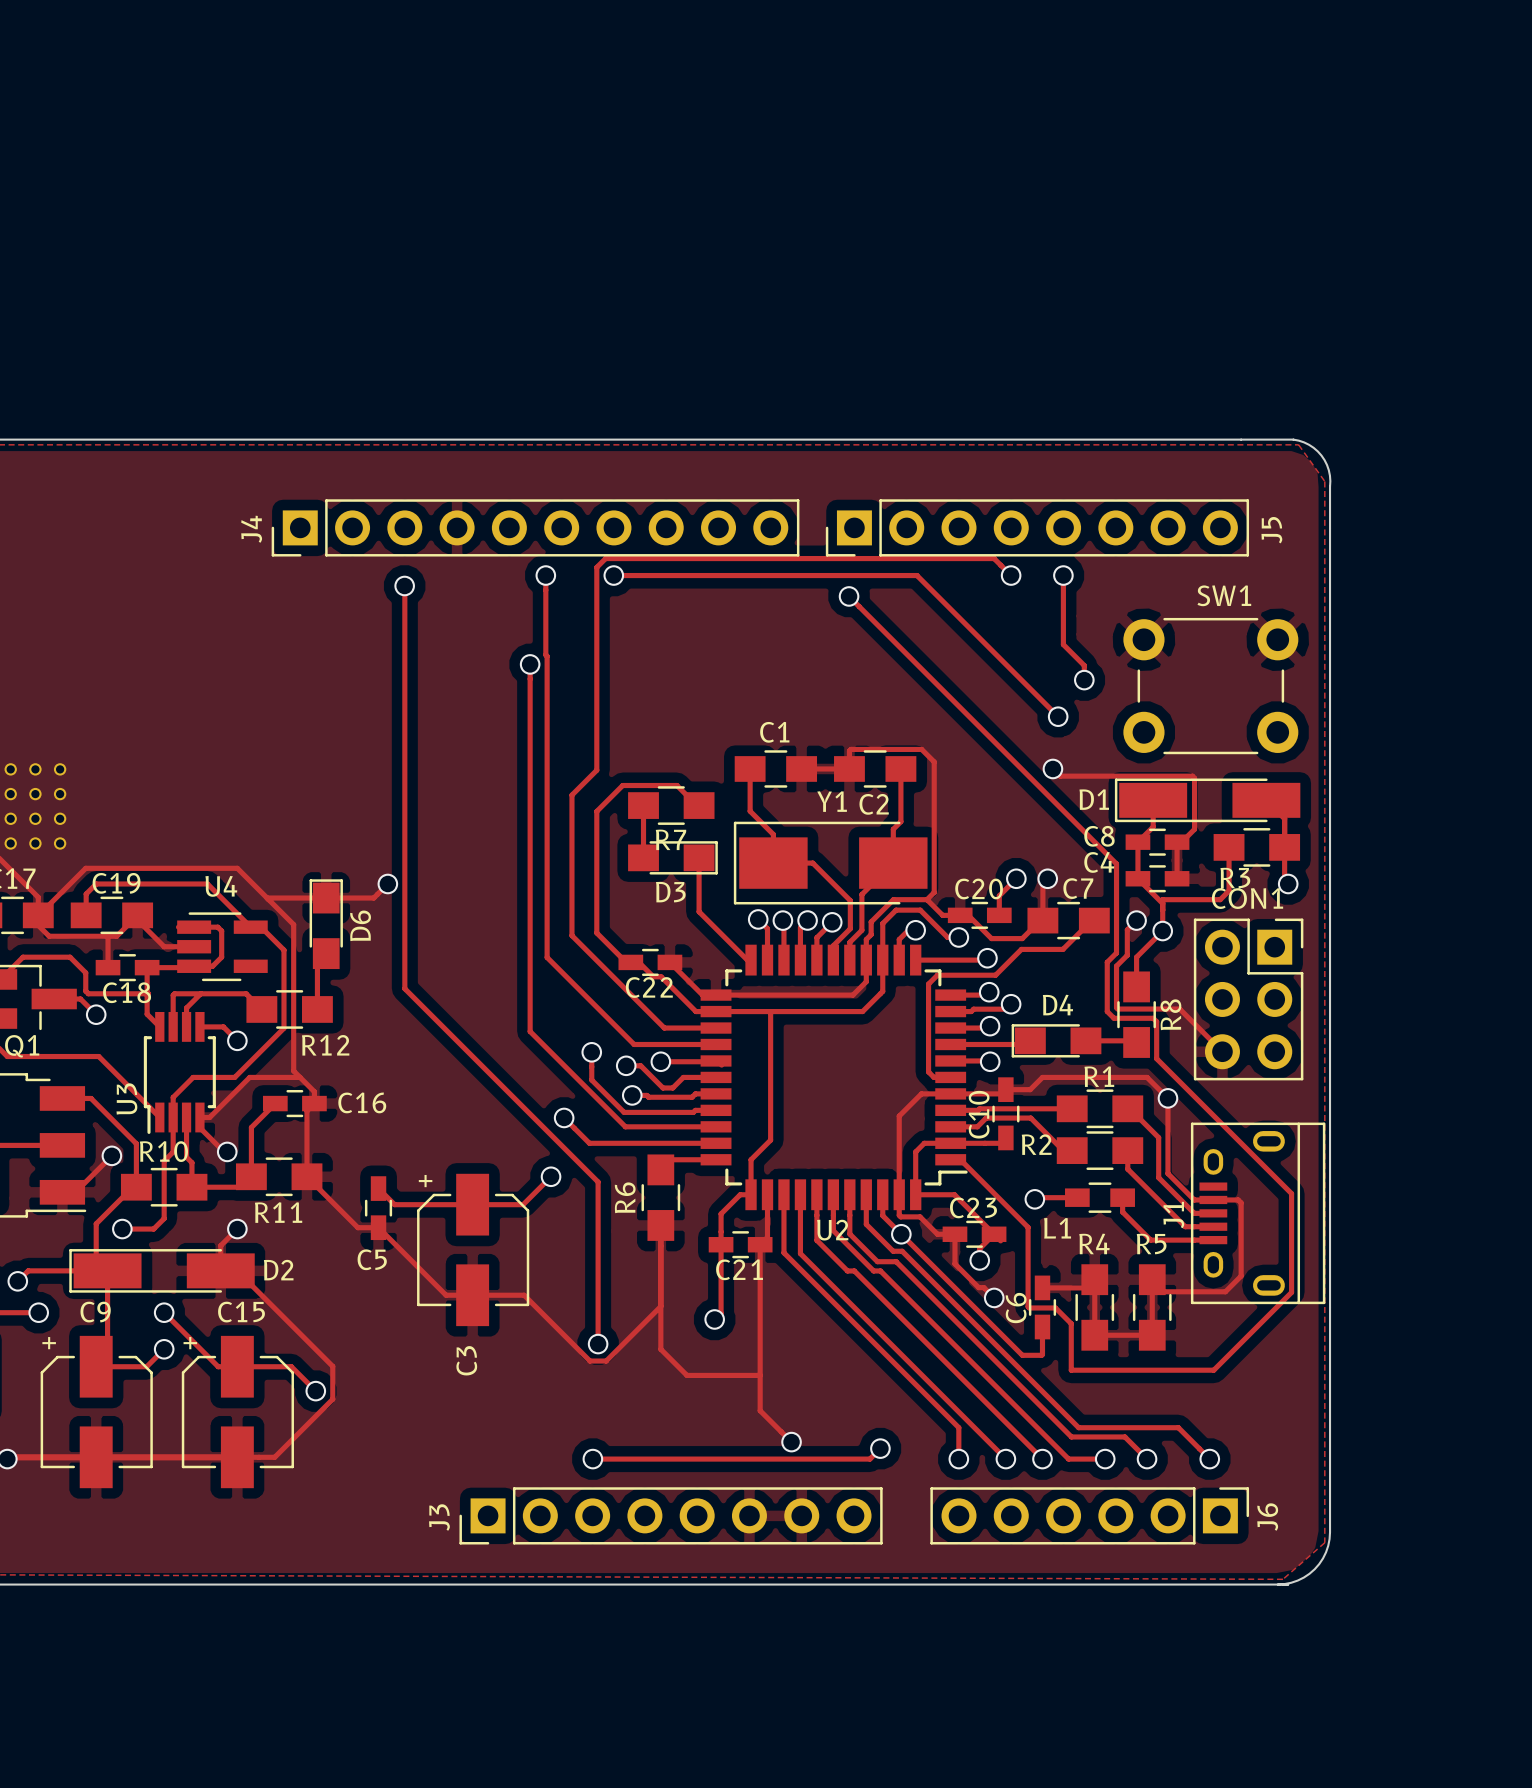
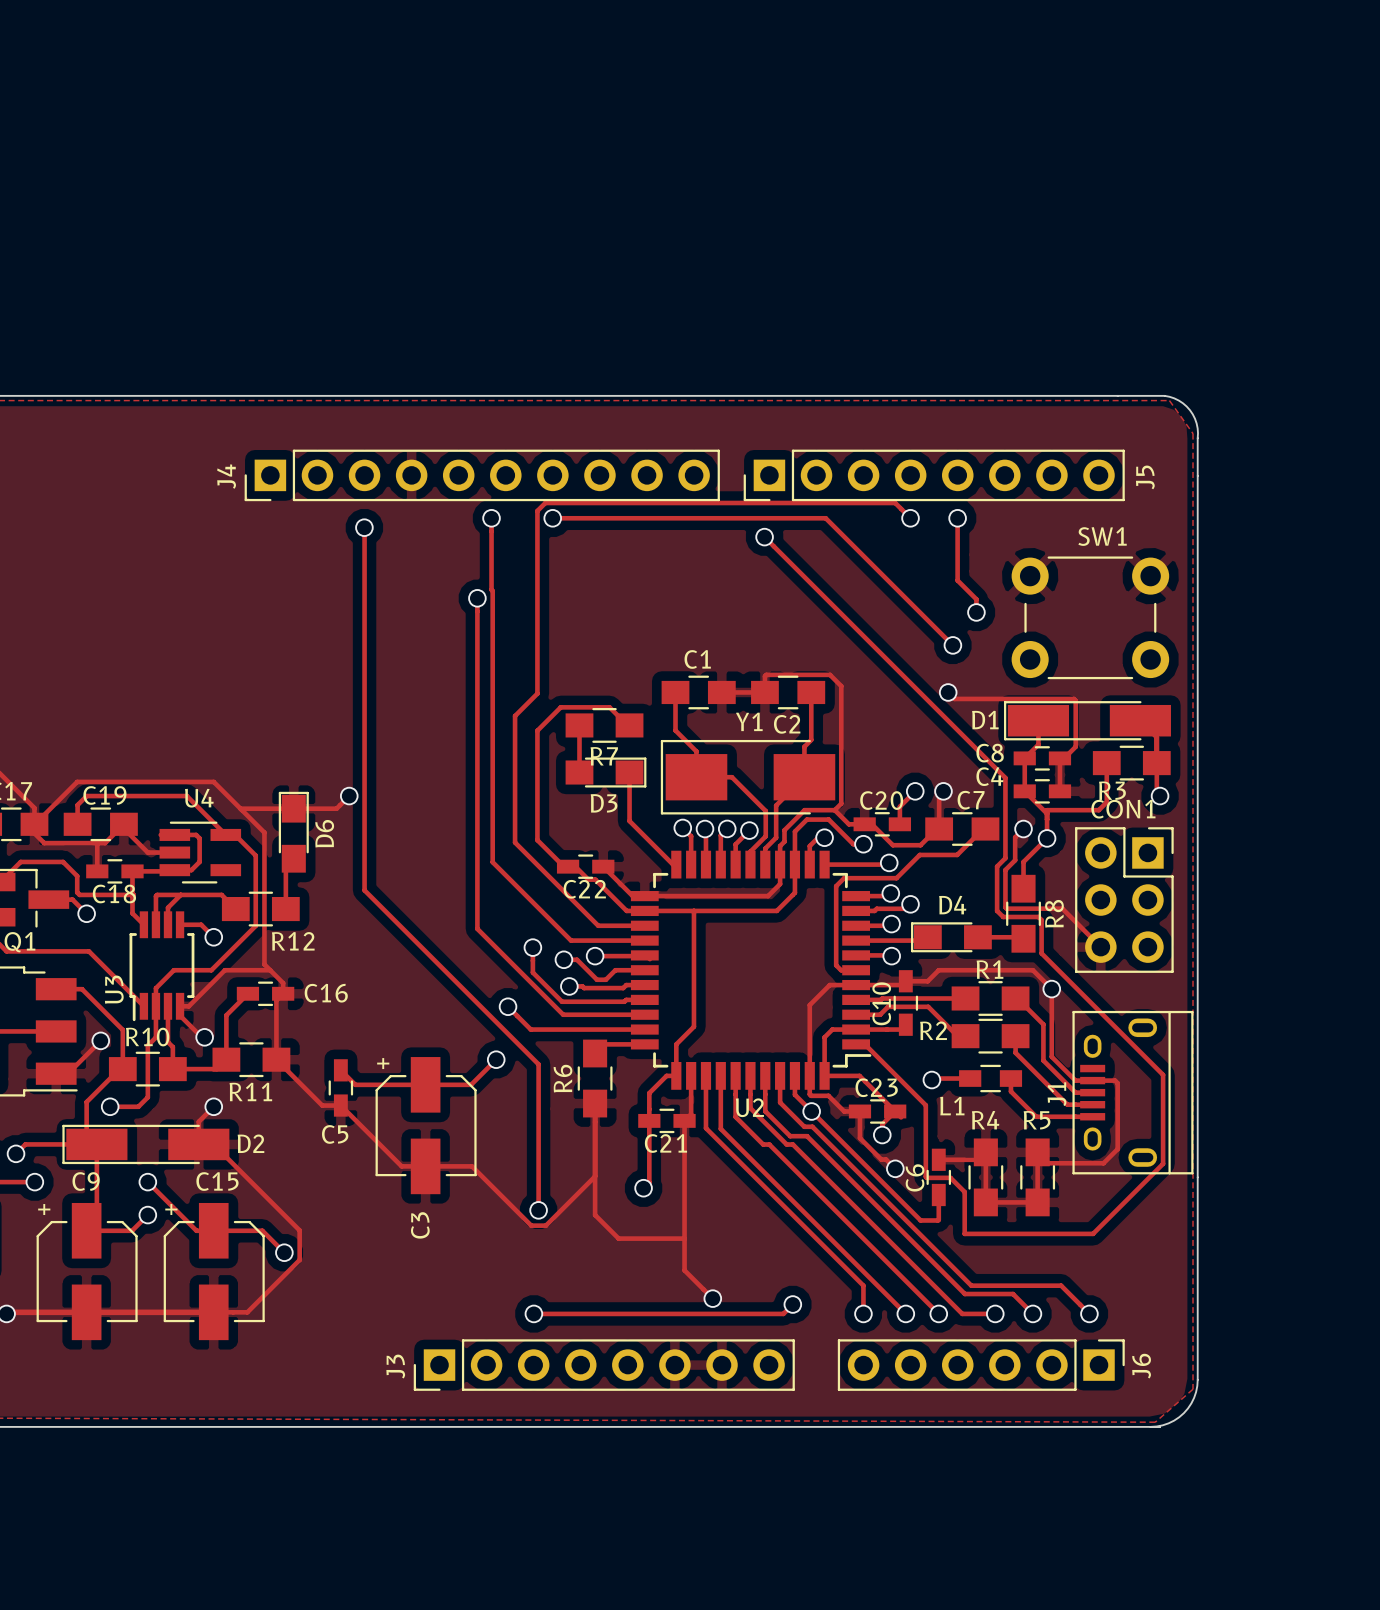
part: (10, 769) -> none
part: (35, 769) -> none
part: (60, 769) -> none
part: (10, 794) -> none
part: (35, 794) -> none
part: (60, 794) -> none
part: (10, 818) -> none
part: (35, 818) -> none
part: (60, 818) -> none
part: (10, 843) -> none
part: (35, 843) -> none
part: (60, 843) -> none

